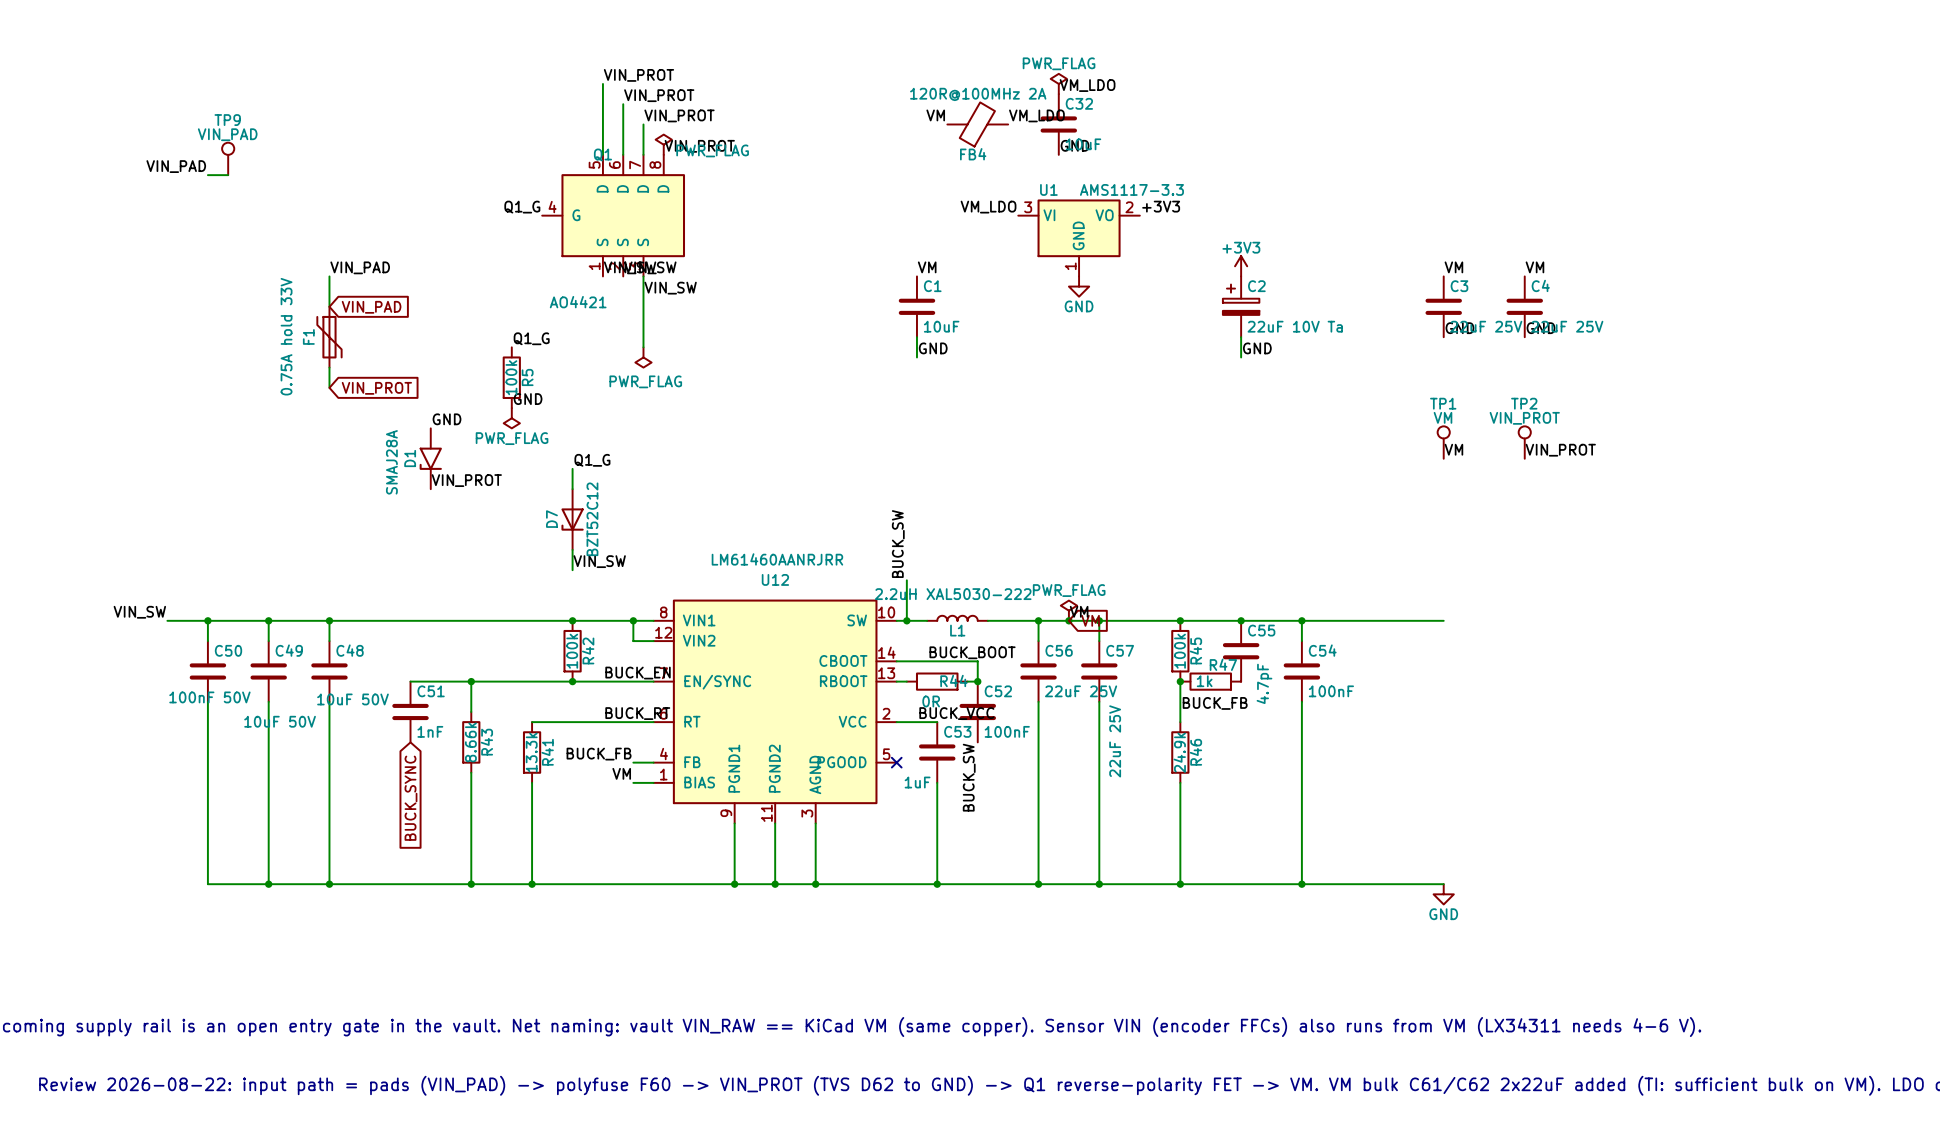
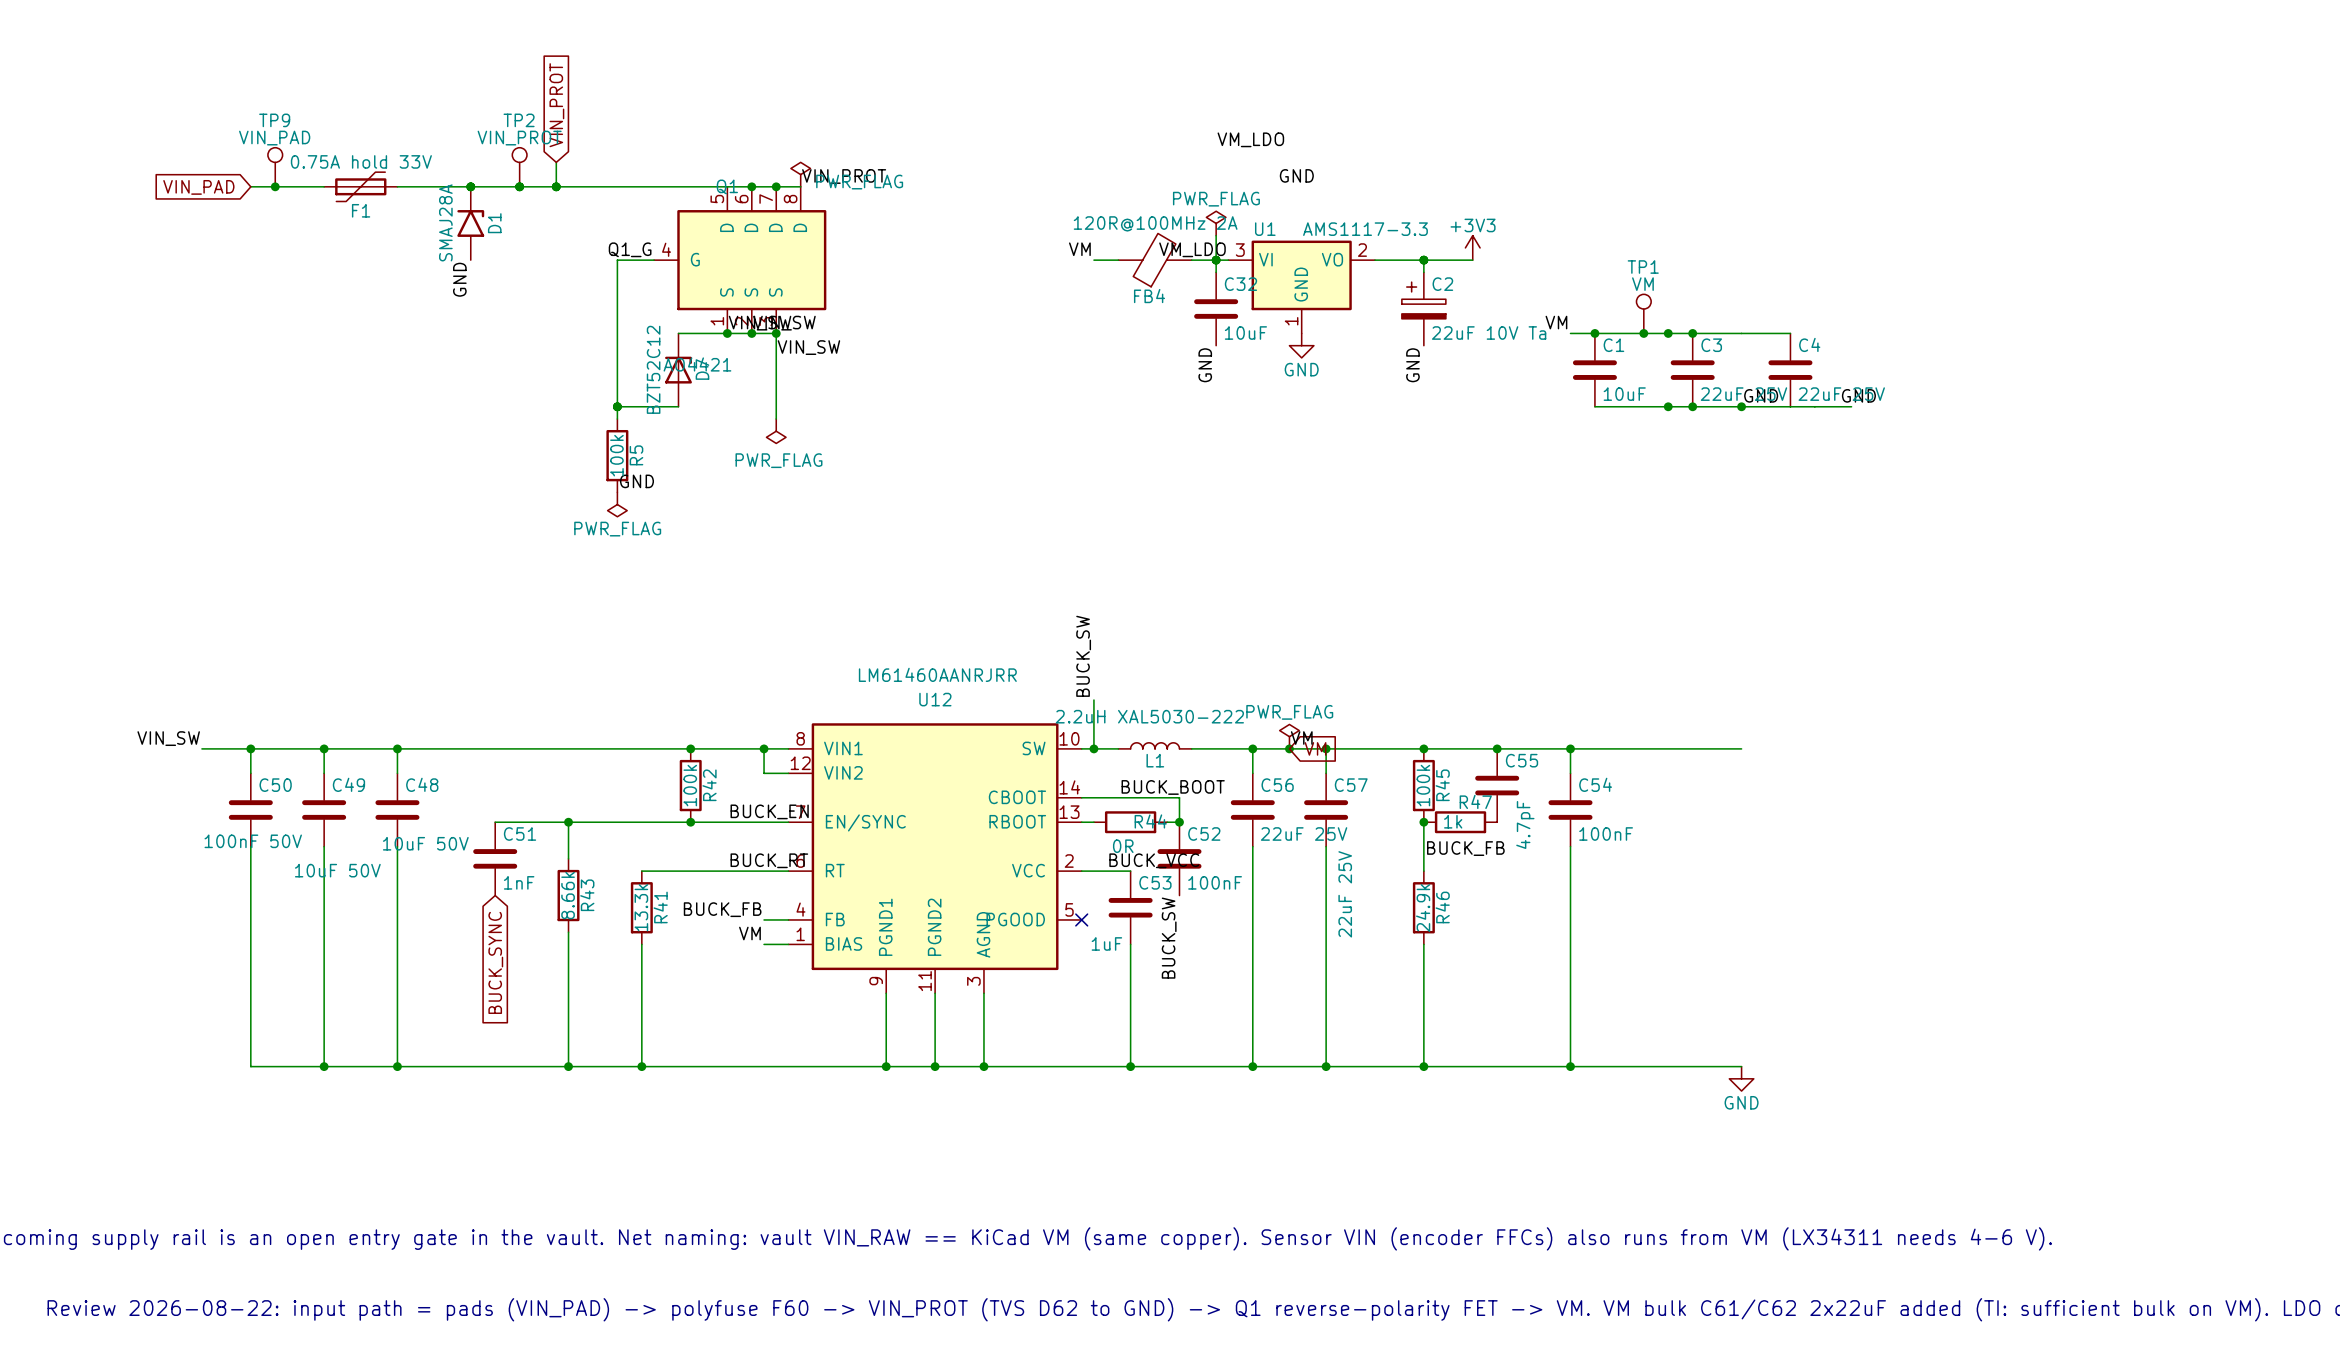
label: VIN_PROT (638, 75) -> none
wire: (602, 83) (602, 154) -> none
power symbol position: PWR_FLAG (1058, 83) -> PWR_FLAG (1216, 223)
label: VM_LDO (1087, 85) -> none
global label: none -> VIN_PROT (556, 105)
label: VIN_PROT (659, 95) -> none
wire: (623, 104) (623, 154) -> none
label: VIN_PROT (679, 115) -> none
label: VM (935, 115) -> none
wire: (643, 124) (643, 154) -> none
FB4 position: (977, 124) -> (1155, 260)
C32 position: (1058, 124) -> (1216, 309)
wire: none -> (556, 162) (556, 186)
wire: none -> (250, 186) (324, 186)
junction: none -> (275, 186)
wire: none -> (397, 186) (800, 186)
junction: none -> (470, 186)
junction: none -> (519, 186)
junction: none -> (556, 186)
junction: none -> (751, 186)
junction: none -> (776, 186)
TP9 position: (228, 158) -> (275, 167)
label: VIN_PAD (176, 166) -> none
wire: (207, 175) (228, 175) -> none
wire: none -> (1216, 235) (1216, 272)
label: none -> VM (1079, 249)
label: +3V3 (1161, 206) -> none
wire: none -> (654, 260) (617, 260) (617, 418)
wire: none -> (1093, 260) (1118, 260)
wire: none -> (1191, 260) (1228, 260)
junction: none -> (1216, 260)
wire: none -> (1374, 260) (1472, 260)
wire: none -> (1423, 260) (1423, 272)
junction: none -> (1423, 260)
label: none -> GND (459, 279)
power symbol position: +3V3 (1241, 266) -> +3V3 (1472, 247)
label: VIN_PAD (360, 267) -> none
label: VM (927, 267) -> none
label: none -> VM (1556, 322)
label: VM (1453, 267) -> none
label: VM (1534, 267) -> none
wire: (329, 276) (329, 306) -> none
wire: none -> (678, 333) (776, 333)
junction: none -> (727, 333)
junction: none -> (751, 333)
junction: none -> (776, 333)
wire: none -> (1570, 333) (1790, 333)
junction: none -> (1594, 333)
junction: none -> (1643, 333)
junction: none -> (1668, 333)
junction: none -> (1692, 333)
C1 position: (916, 306) -> (1594, 370)
C2 position: (1241, 306) -> (1423, 309)
C3 position: (1443, 306) -> (1692, 370)
C4 position: (1524, 306) -> (1790, 370)
global label rotation: 0° (371, 307) -> 180° (198, 187)
global label position: VIN_PAD (371, 307) -> VIN_PAD (198, 187)
F1 value position: 0.75A hold 33V (286, 336) -> 0.75A hold 33V (361, 161)
F1 name position: F1 (308, 336) -> F1 (361, 210)
F1 rotation: 0° (329, 337) -> 90° clockwise (360, 186)
F1 position: (329, 337) -> (360, 186)
wire: none -> (617, 406) (678, 406)
junction: none -> (617, 406)
wire: (916, 337) (916, 357) -> none
wire: (1241, 337) (1241, 357) -> none
wire: none -> (1594, 406) (1851, 406)
junction: none -> (1668, 406)
junction: none -> (1692, 406)
junction: none -> (1741, 406)
label: Q1_G (531, 338) -> none
label rotation: 0° (933, 348) -> 90° counterclockwise (1205, 365)
label position: GND (933, 348) -> GND (1205, 365)
label rotation: 0° (1257, 348) -> 90° counterclockwise (1412, 365)
label position: GND (1257, 348) -> GND (1412, 365)
wire: (329, 367) (329, 387) -> none
global label: VIN_PROT (376, 388) -> none
label: GND (447, 419) -> none
TP1 position: (1443, 442) -> (1643, 313)
TP2 position: (1524, 442) -> (519, 167)
label: VM (1453, 449) -> none
label: VIN_PROT (1560, 450) -> none
D1 rotation: 0° (430, 458) -> 180° (470, 223)
D1 position: (430, 458) -> (470, 223)
label: Q1_G (592, 460) -> none
D1 value position: SMAJ28A (391, 462) -> SMAJ28A (445, 222)
wire: (572, 468) (572, 489) -> none
label: VIN_PROT (466, 480) -> none
D7 rotation: 0° (572, 519) -> 180° (678, 370)
D7 position: (572, 519) -> (678, 370)
wire: (572, 549) (572, 570) -> none
label: VIN_SW (599, 561) -> none

